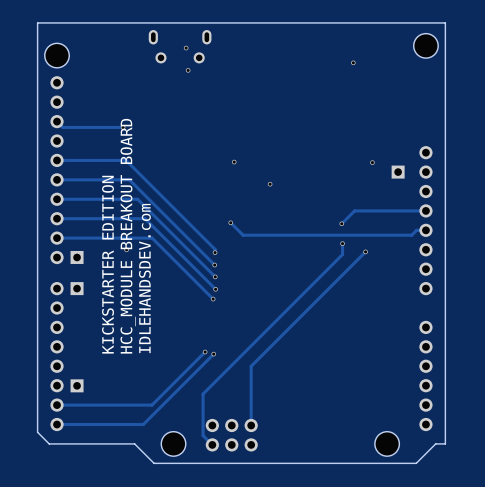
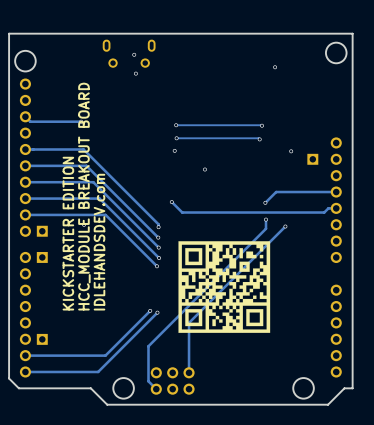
track: none -> (176, 125) (262, 125)
via: none -> (176, 125)
via: none -> (262, 125)
track: none -> (176, 138) (259, 139)
via: none -> (176, 138)
via: none -> (259, 139)
drawing: none -> [178, 241, 271, 333]

